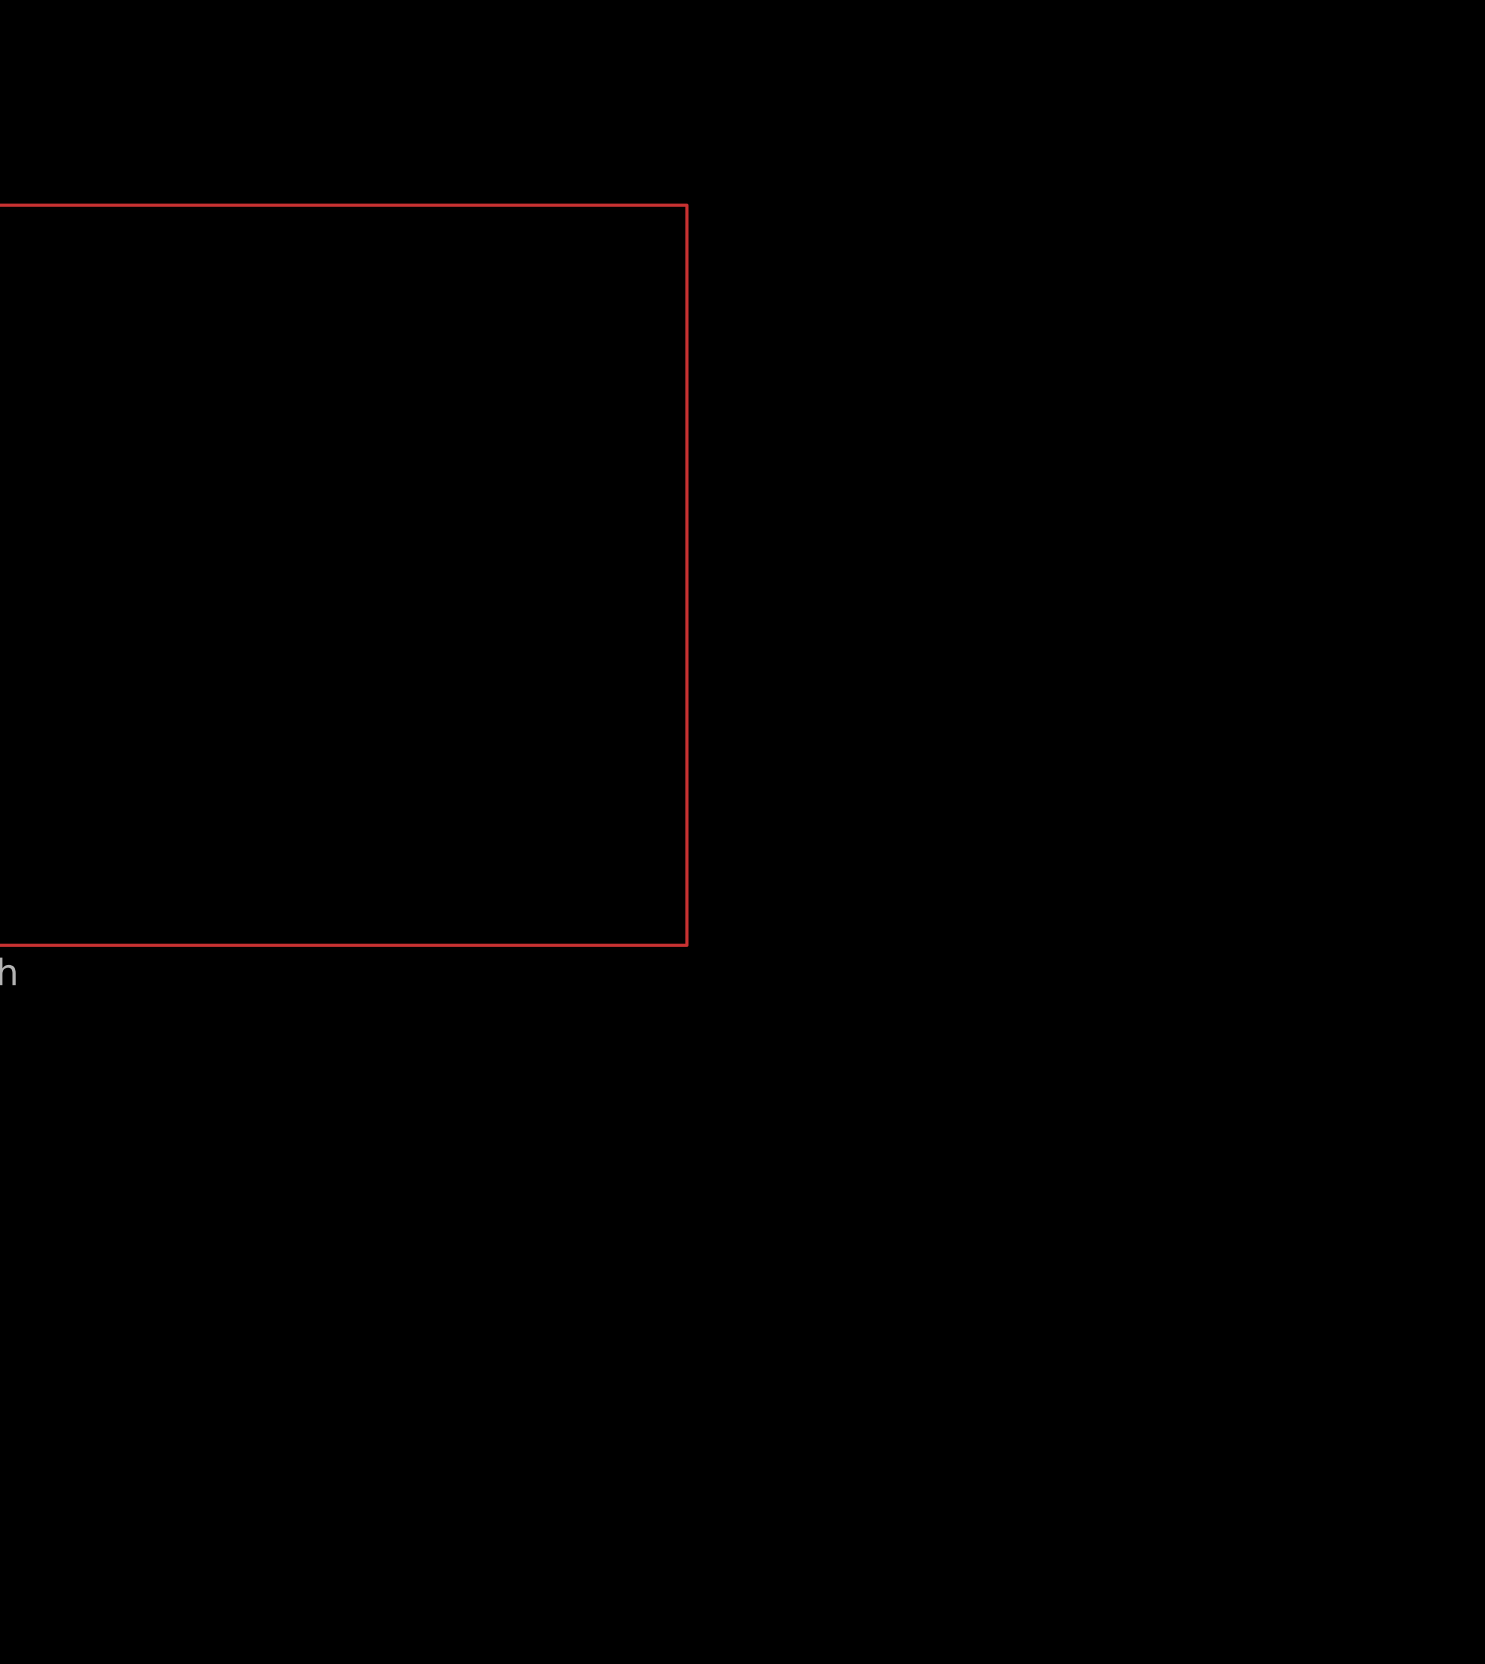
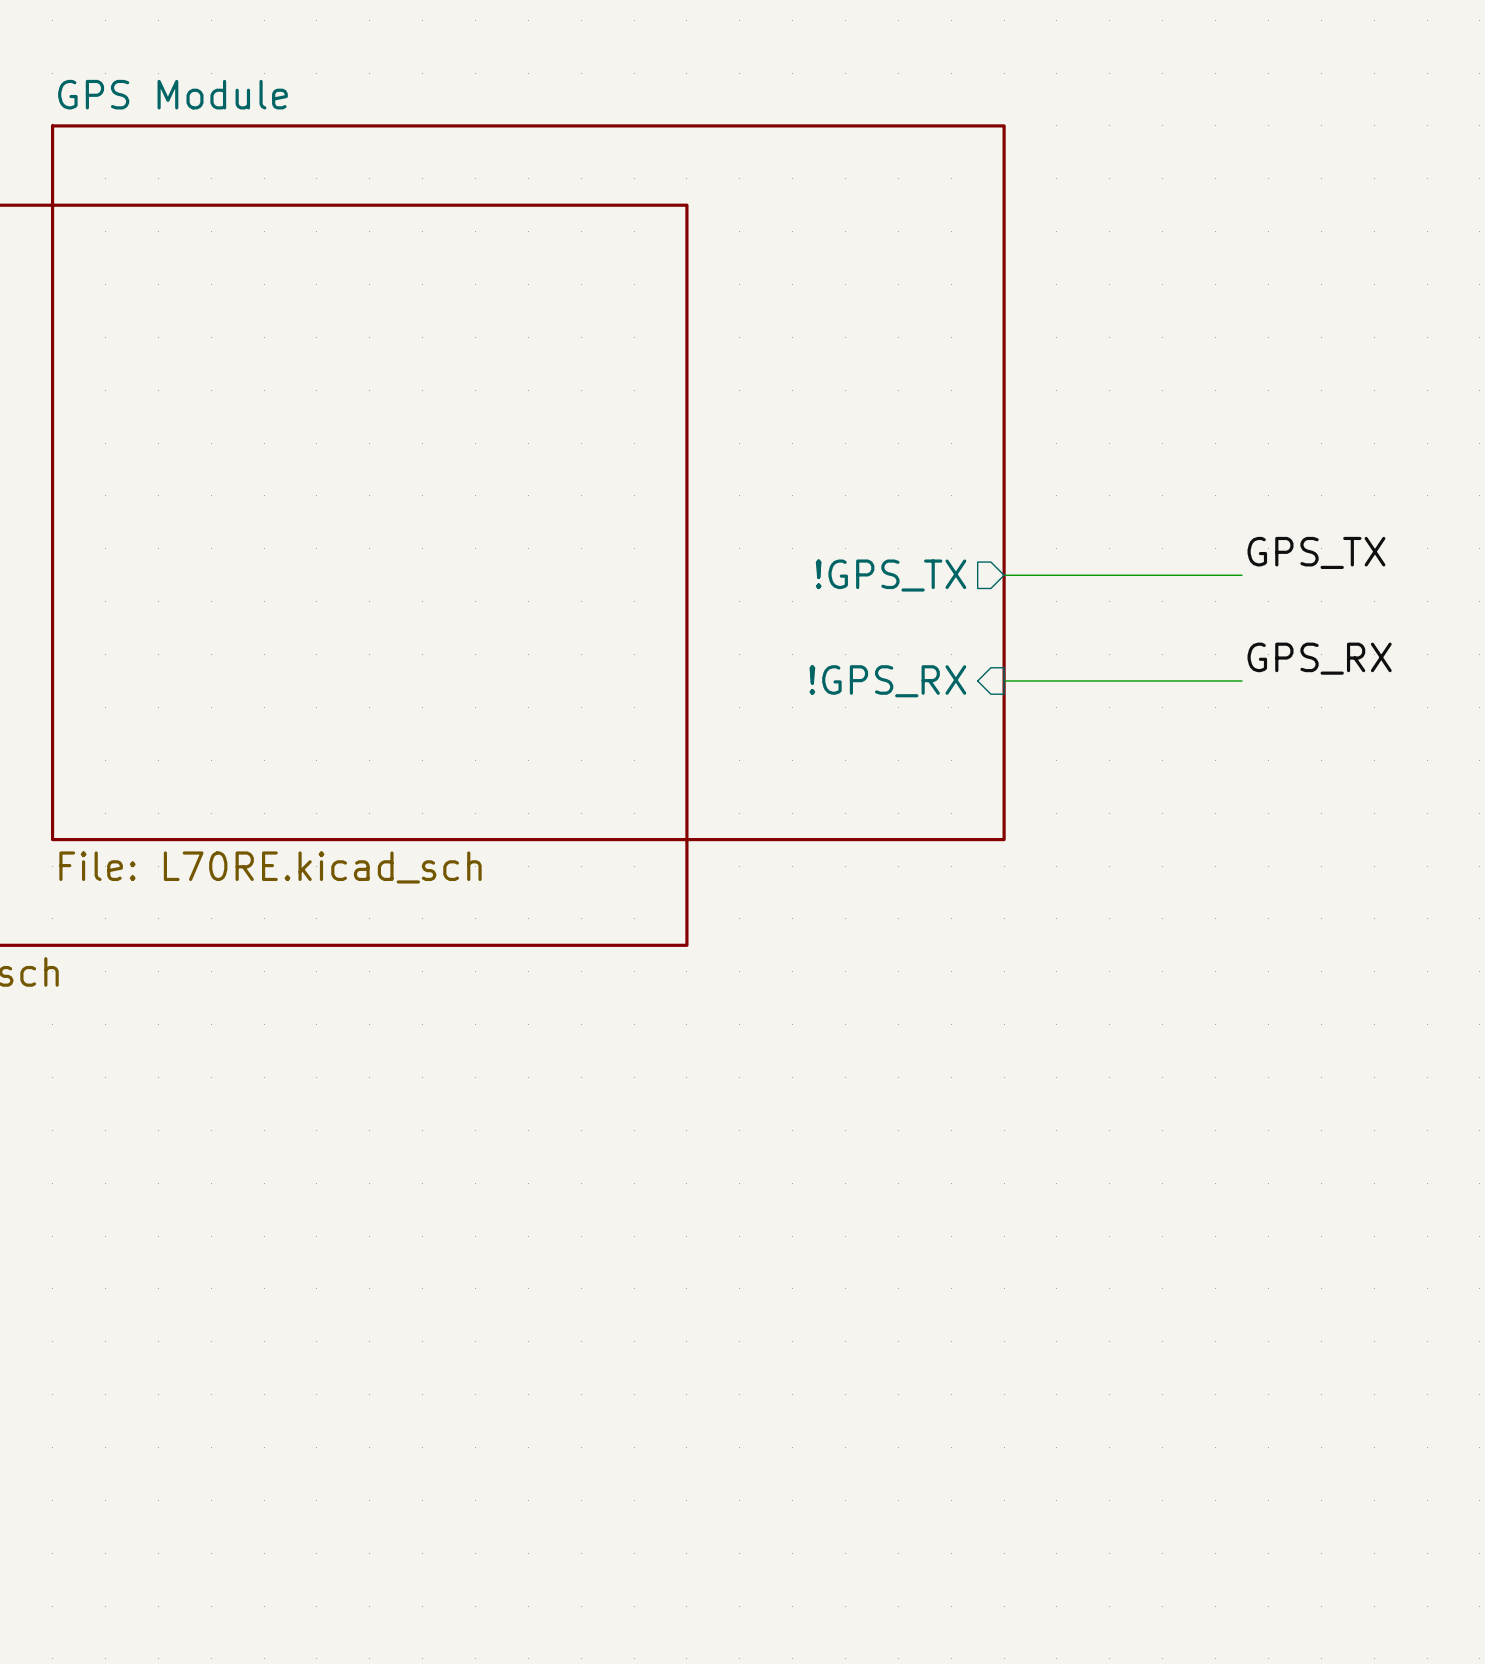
sheet GPS Module: none -> File: L70RE.kicad_sch (528, 482)
label: none -> GPS_TX (1316, 552)
wire: none -> (1004, 575) (1241, 575)
sheet pin: none -> !GPS_TX (891, 575)
label: none -> GPS_RX (1319, 658)
wire: none -> (1004, 680) (1241, 680)
sheet pin: none -> !GPS_RX (887, 681)

